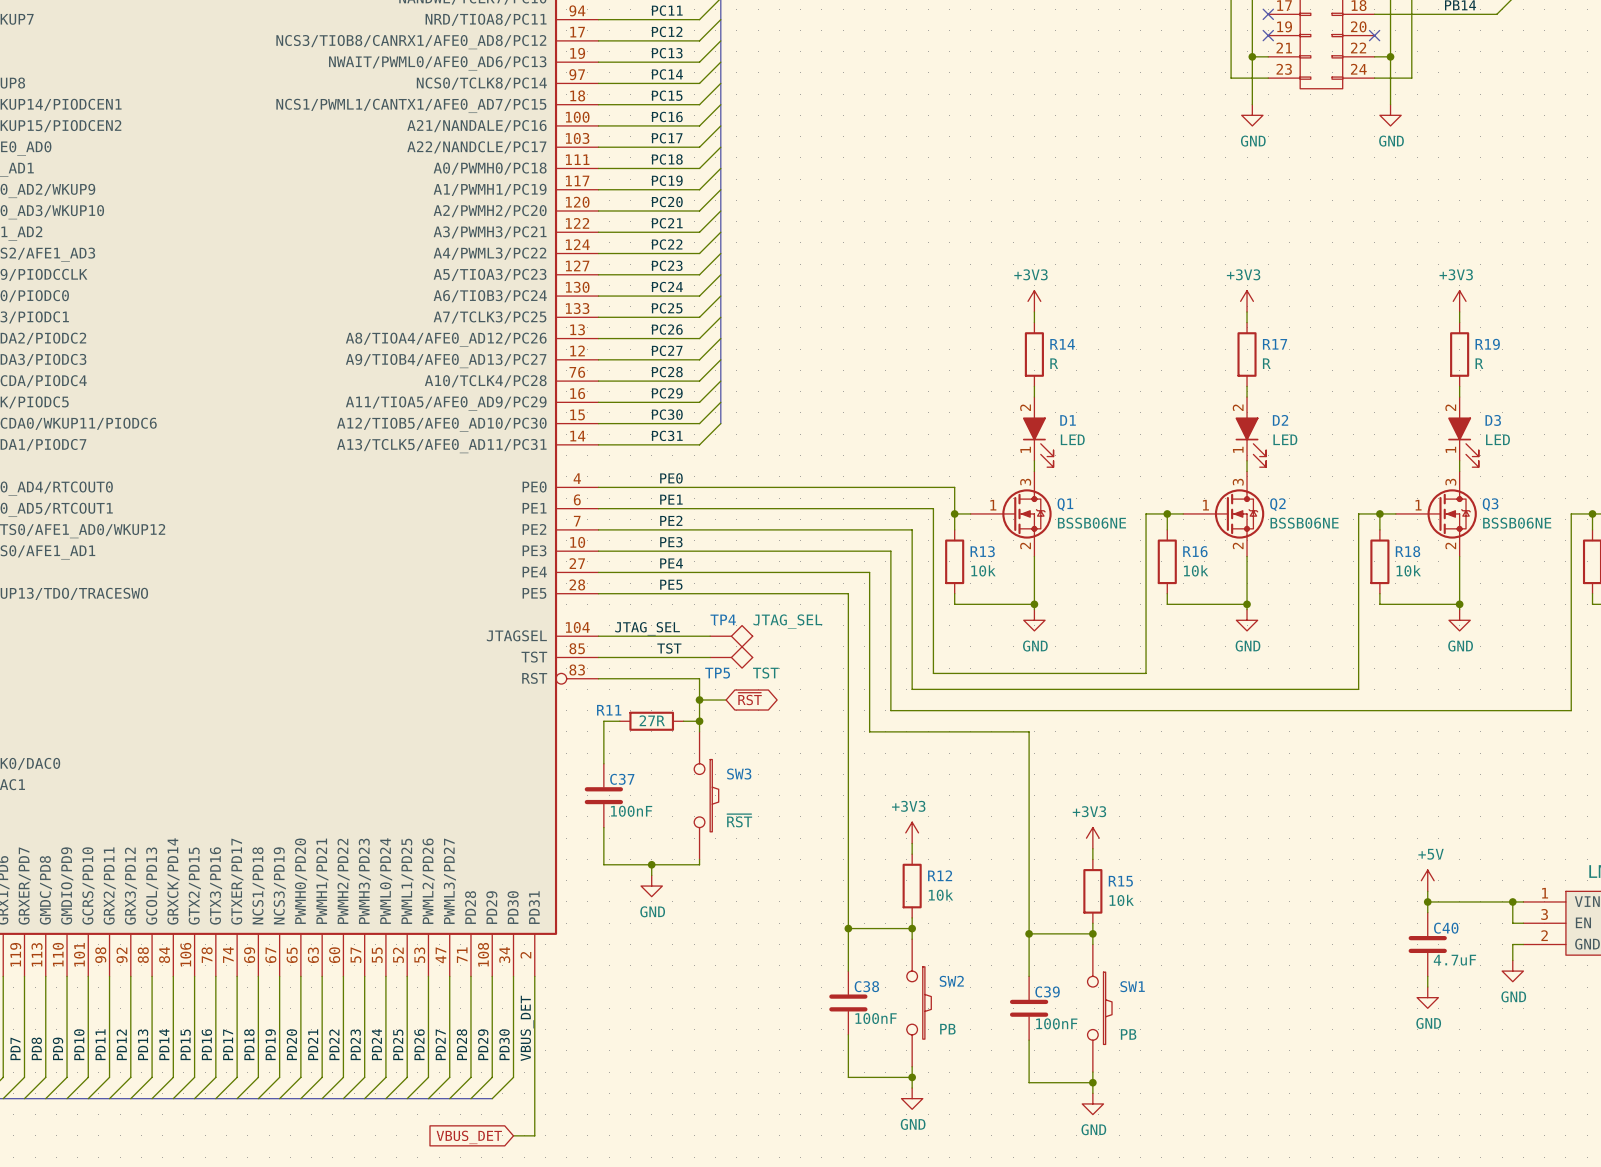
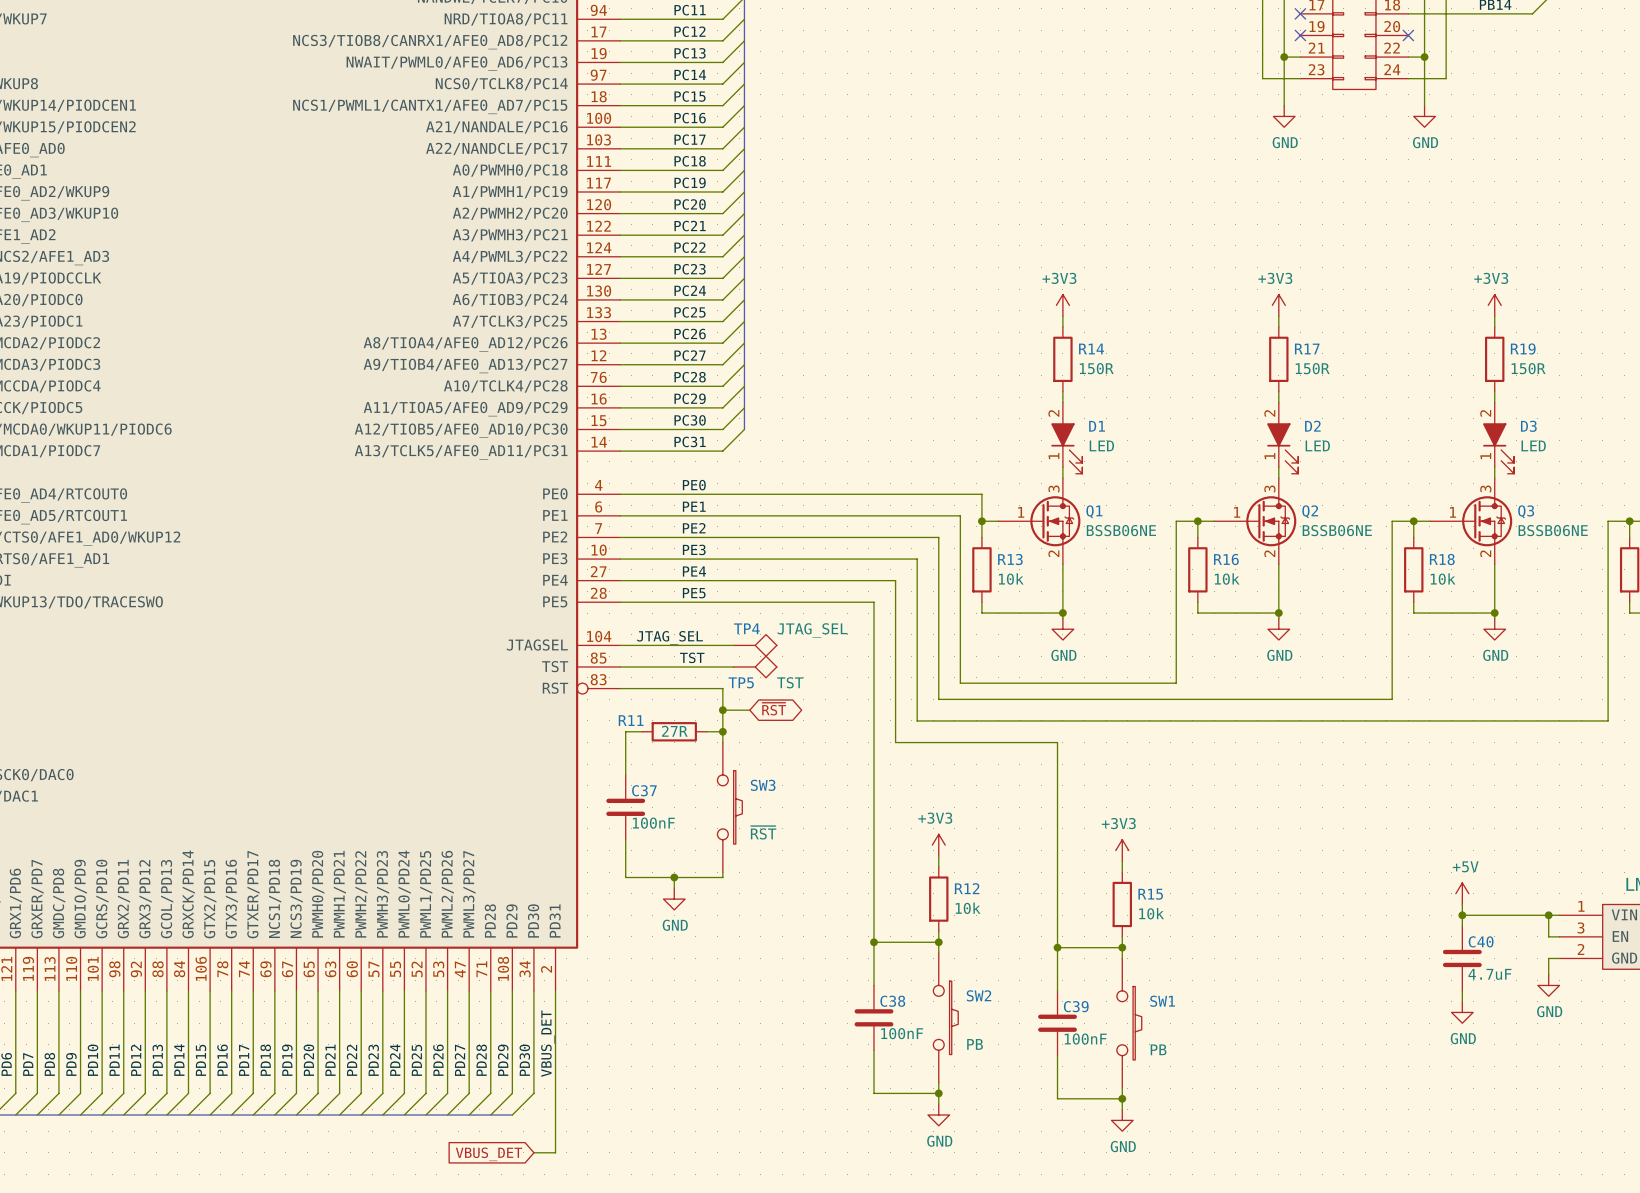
R14 value: R (1054, 363) -> 150R (1096, 368)
R17 value: R (1266, 363) -> 150R (1312, 368)
R19 value: R (1479, 363) -> 150R (1528, 368)

